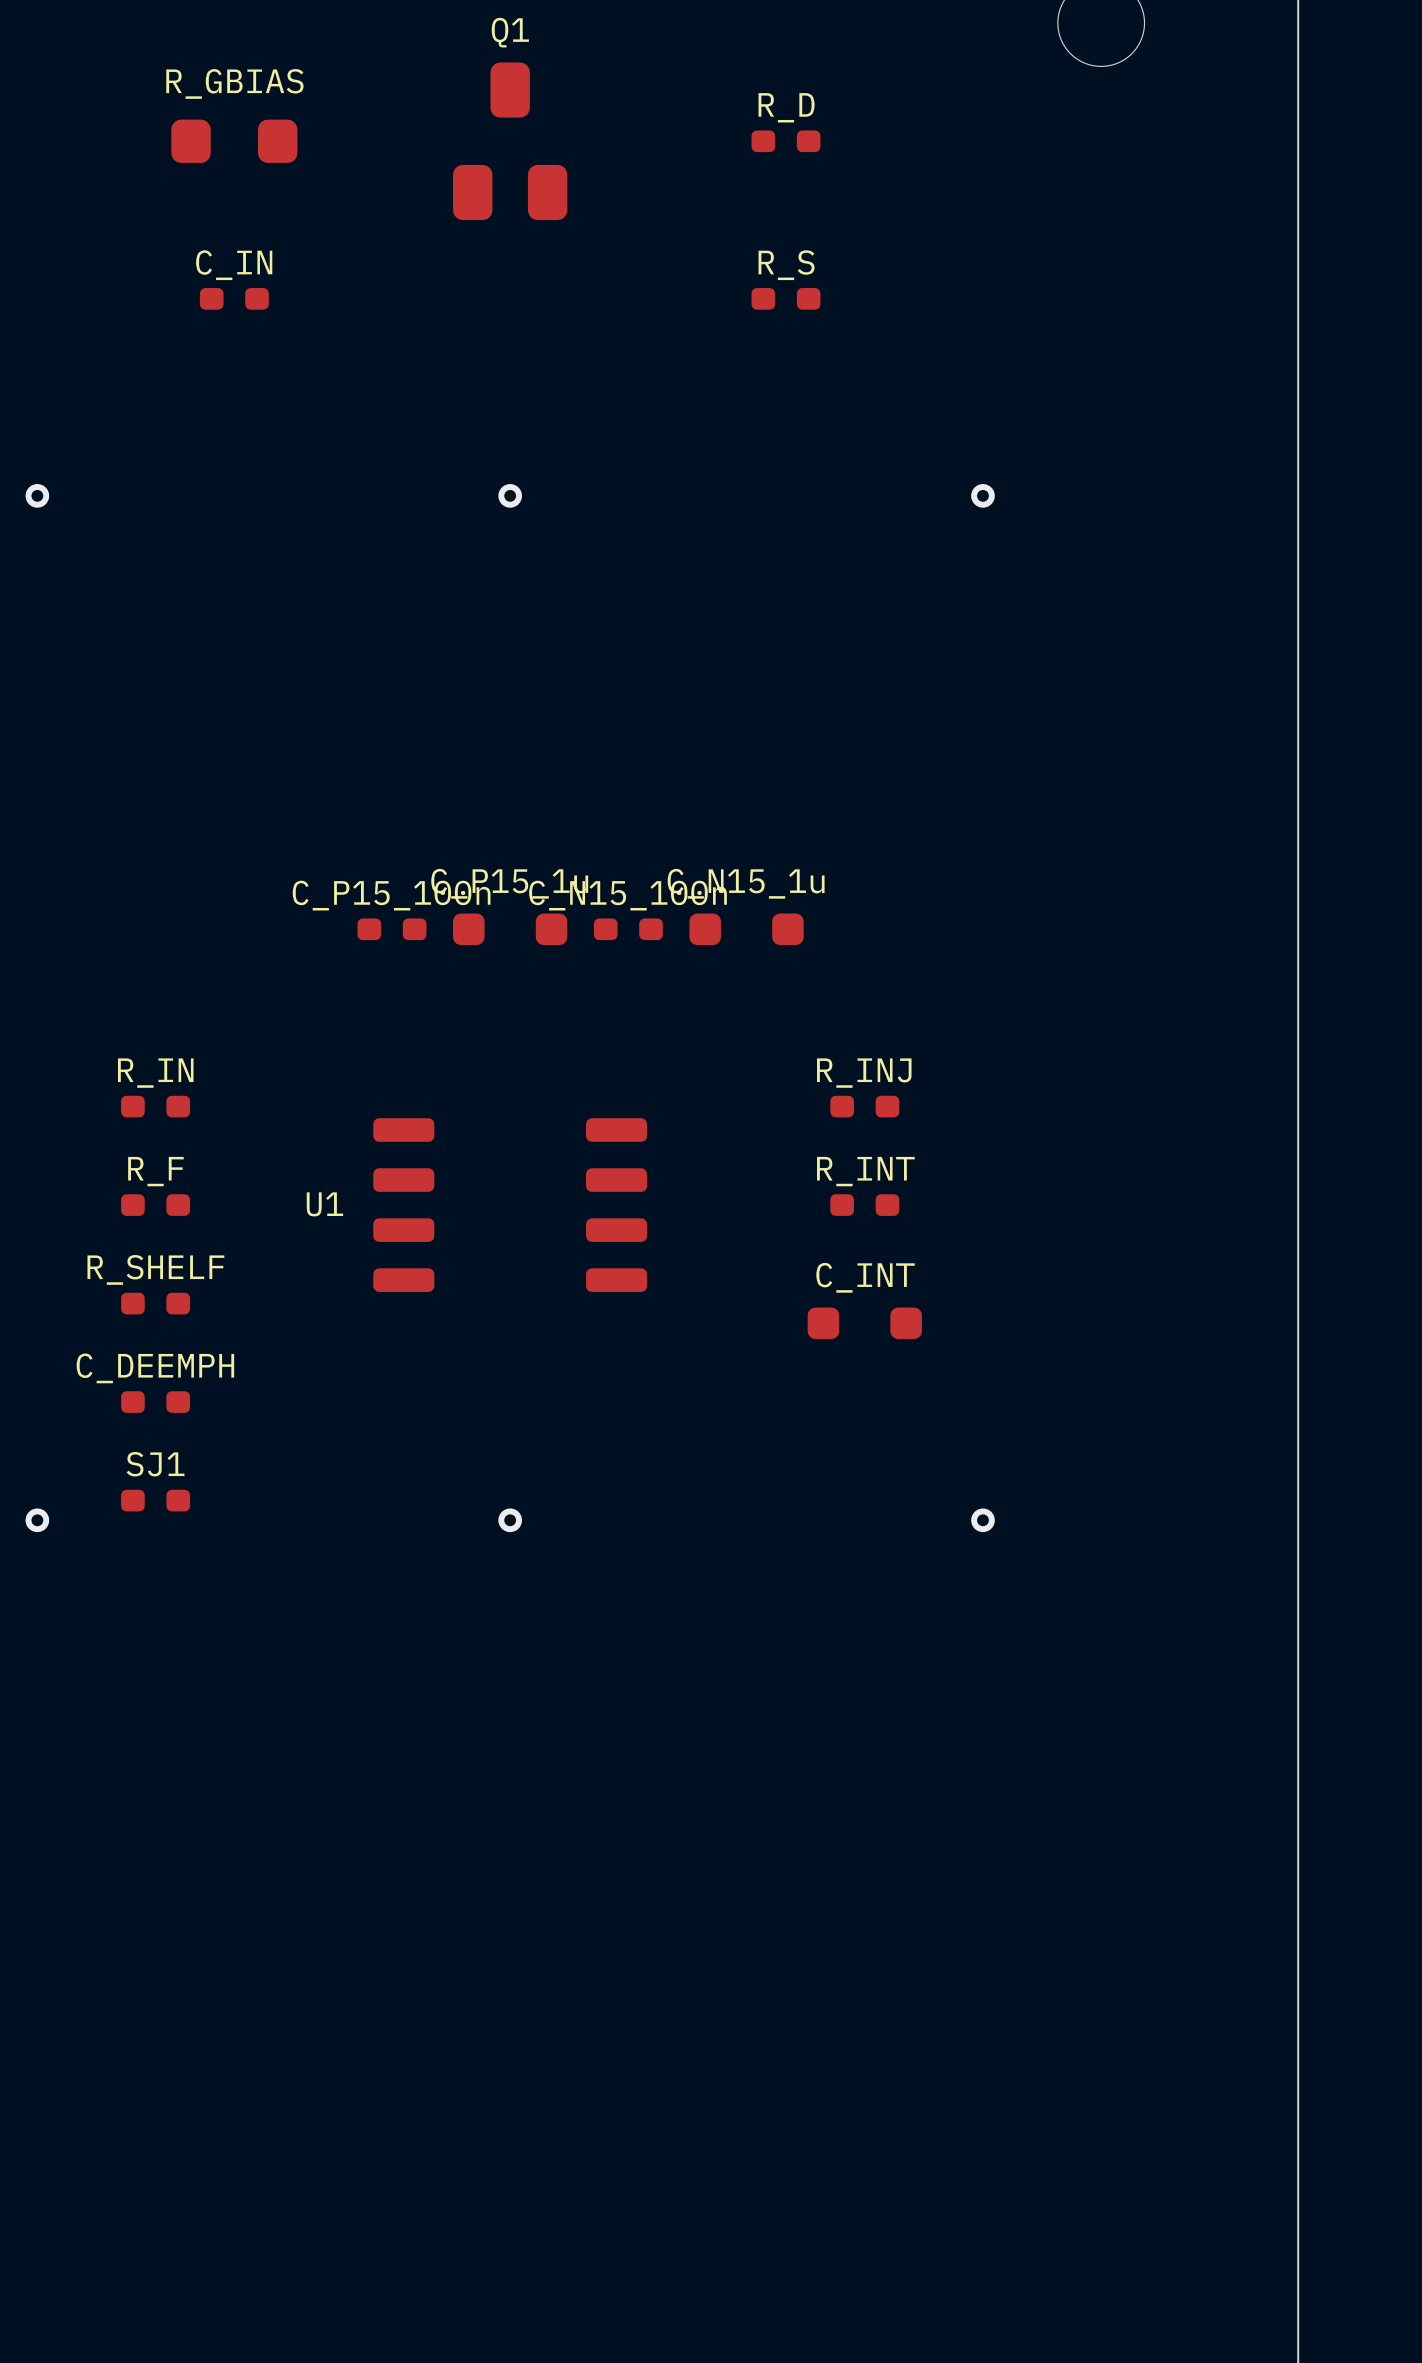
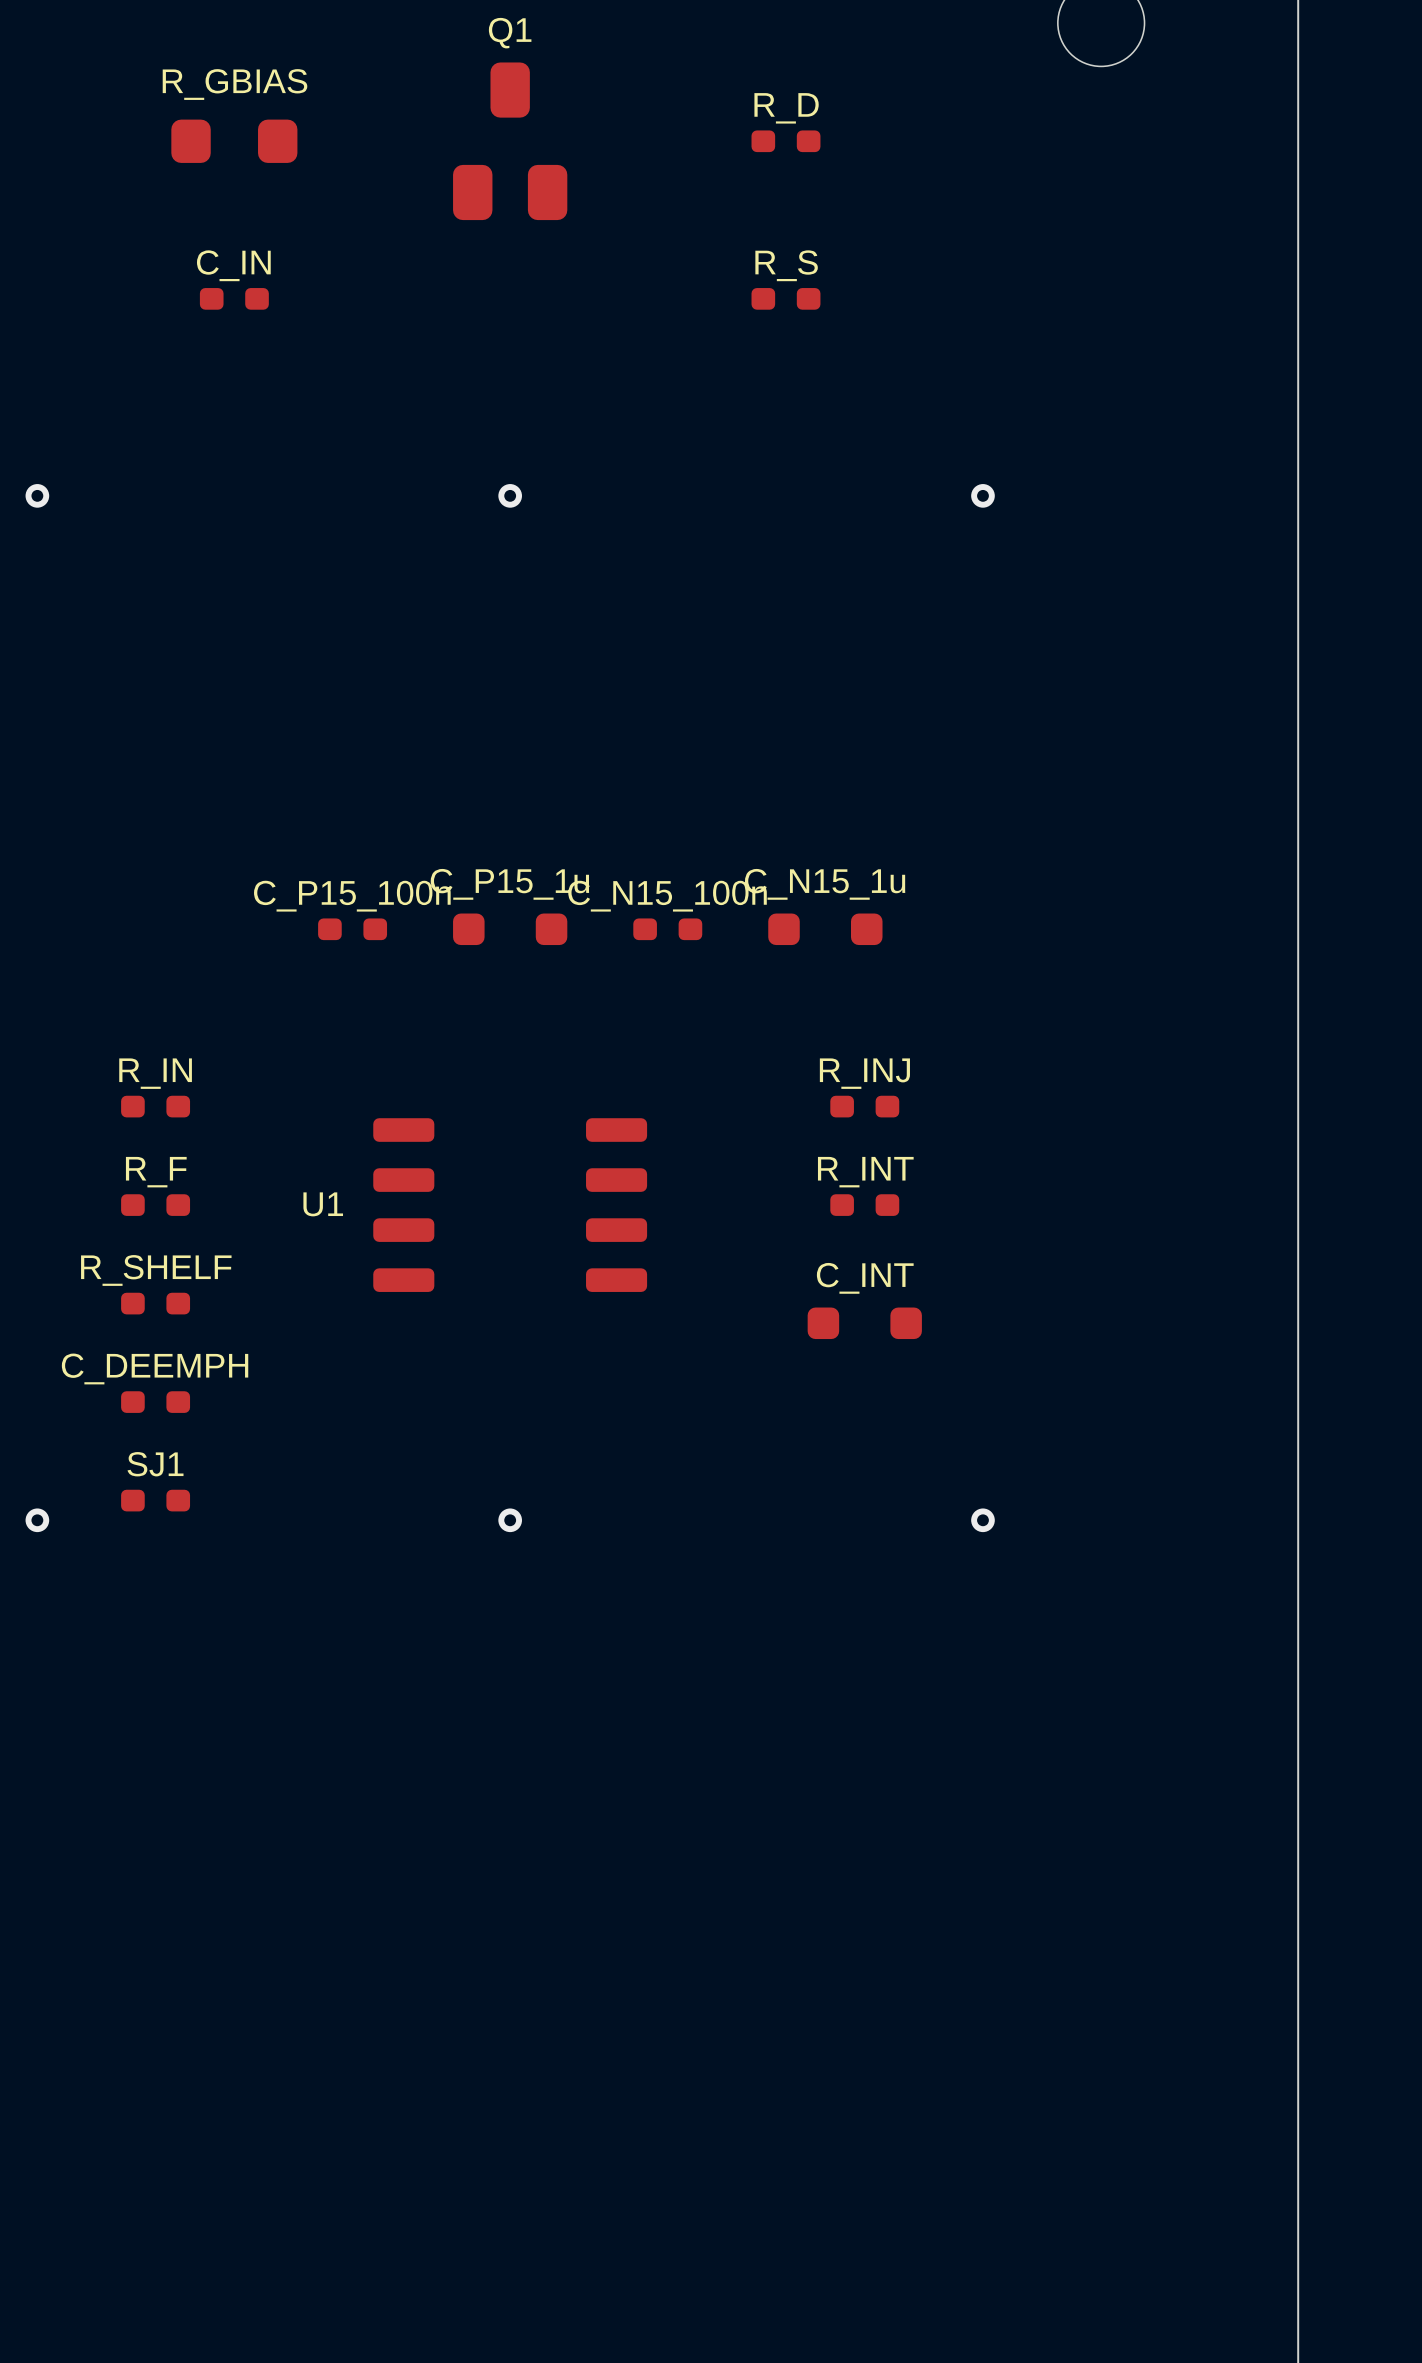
C_P15_100n position: (391, 929) -> (352, 929)
C_N15_100n position: (628, 929) -> (667, 929)
C_N15_1u position: (746, 929) -> (825, 929)

